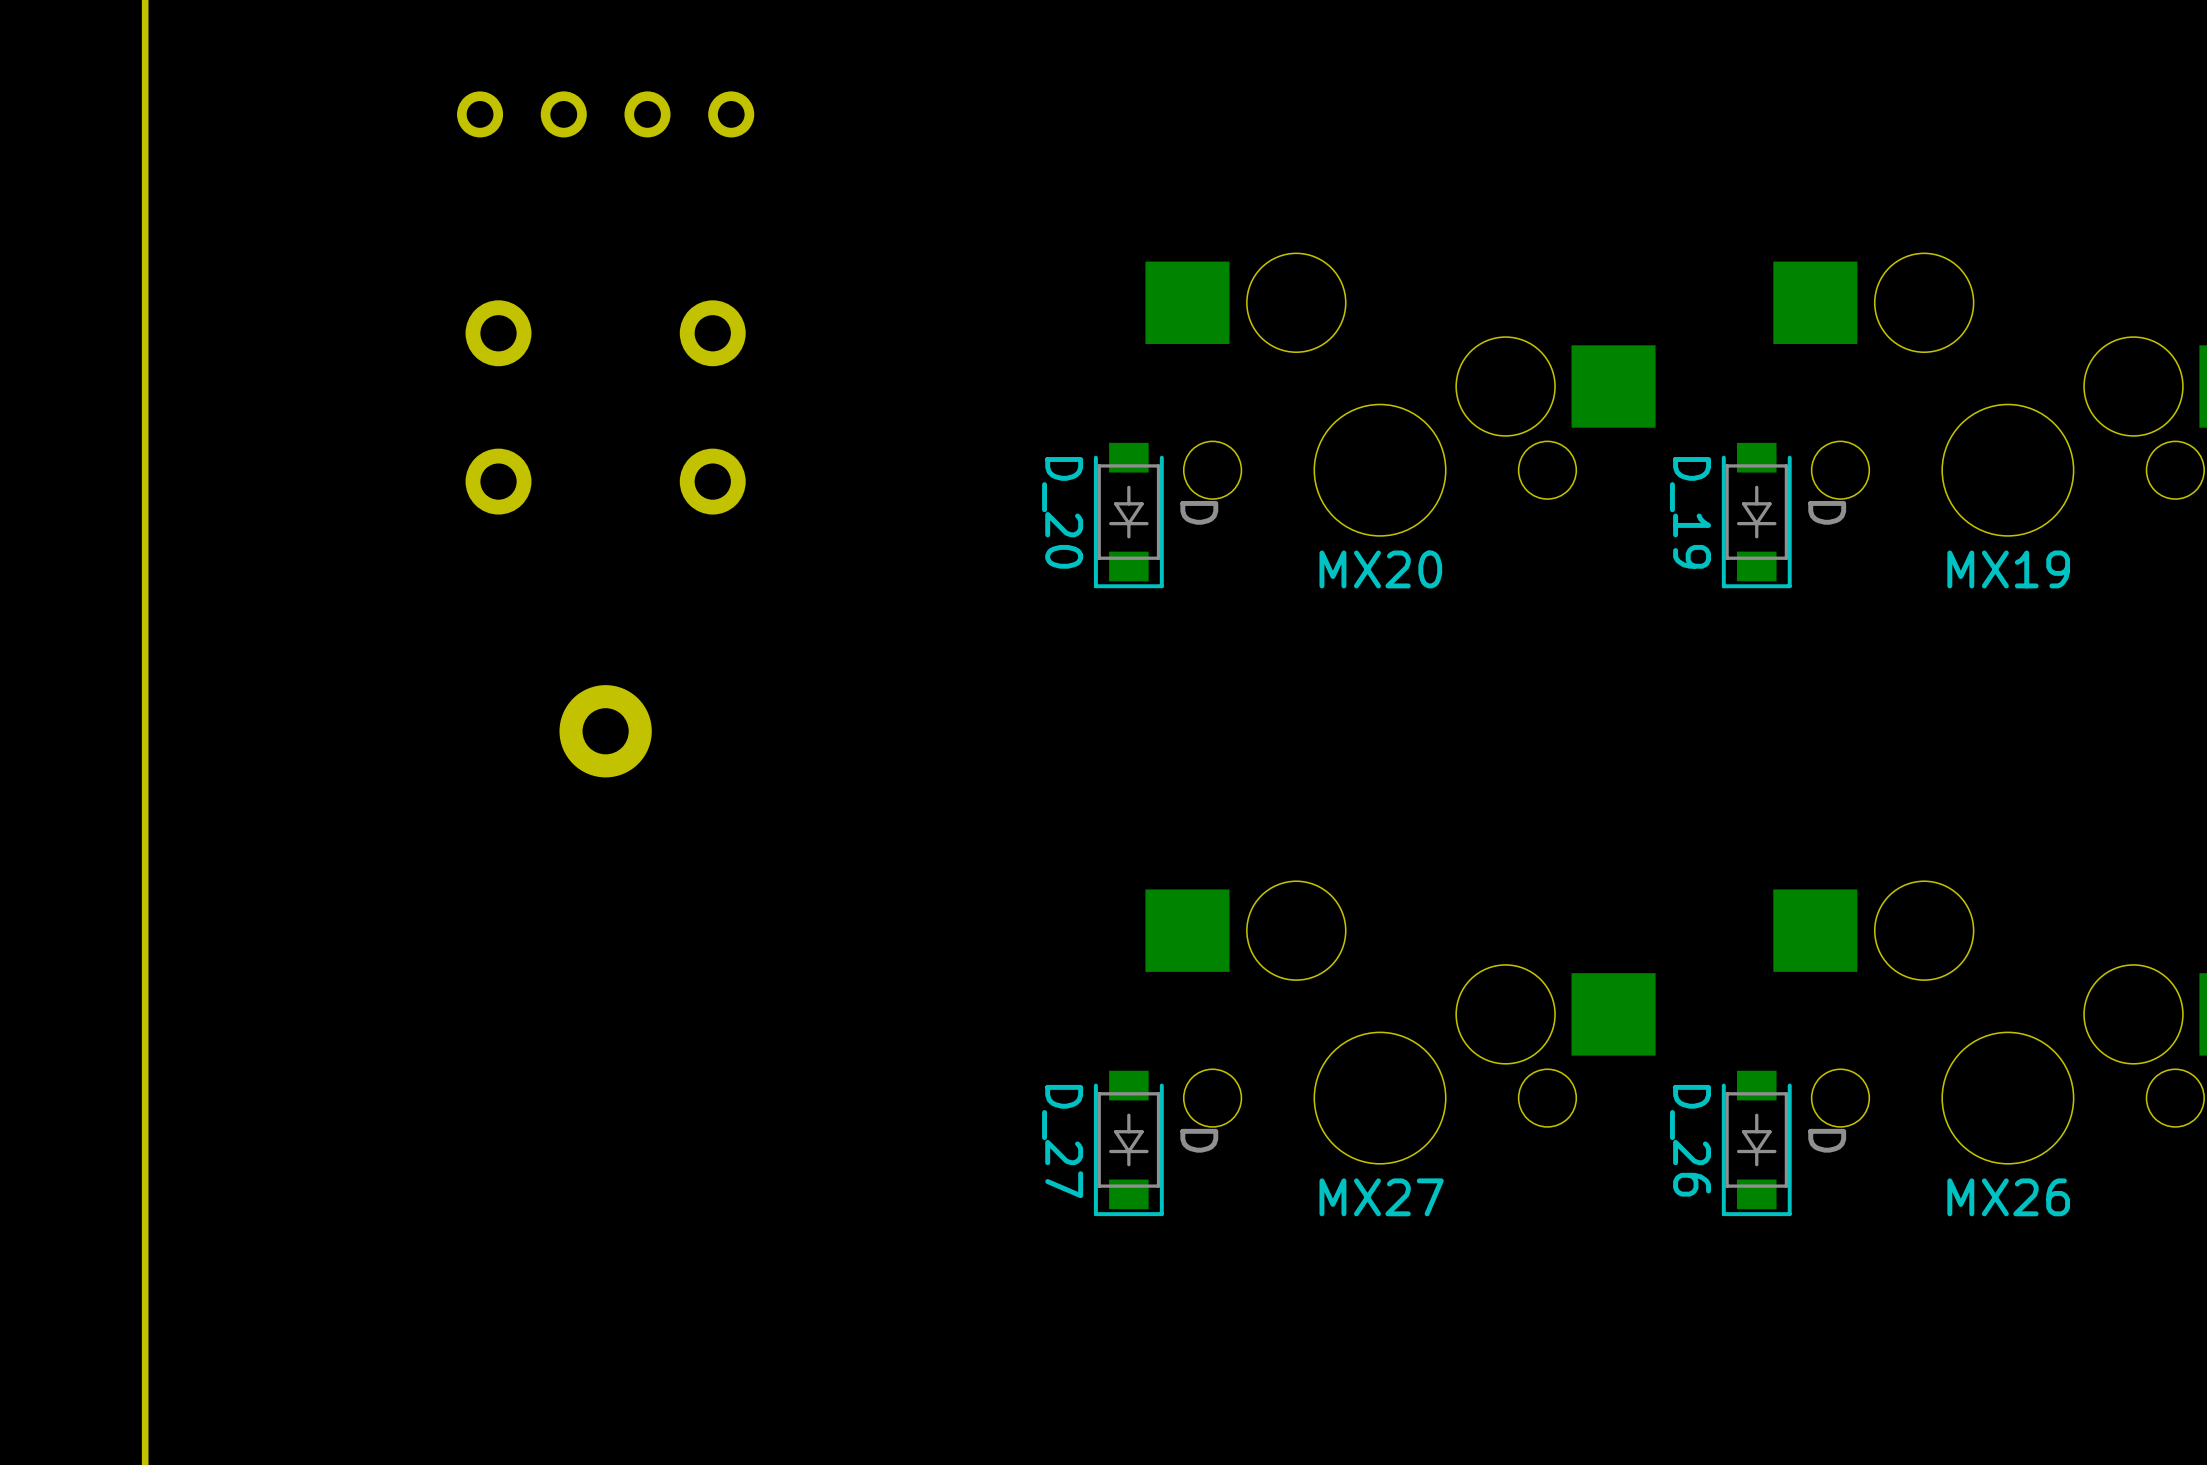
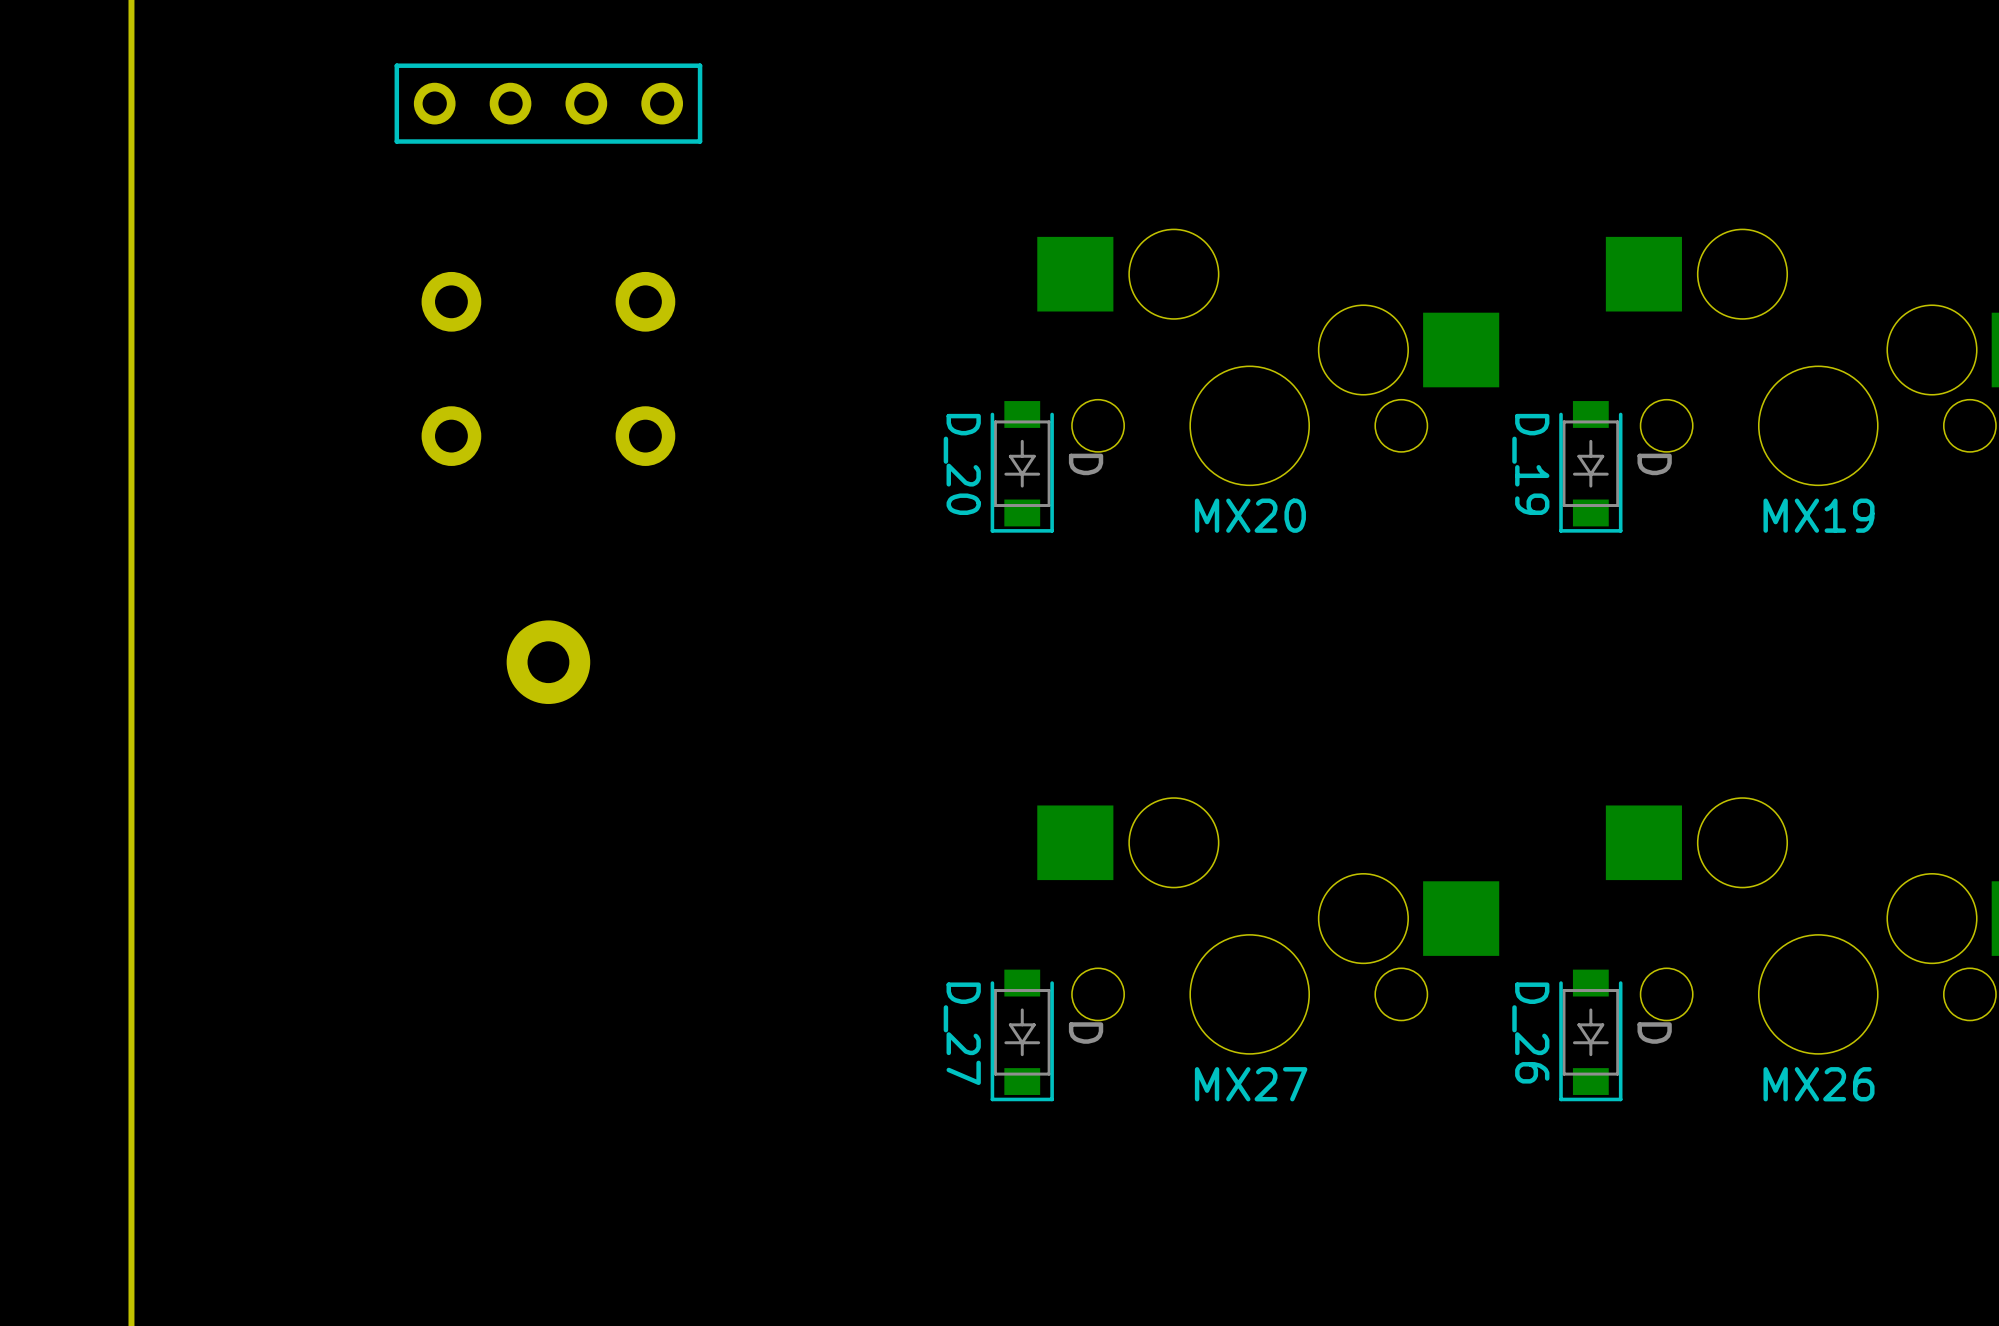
part footprint: [457, 91, 755, 138] -> [394, 63, 703, 144]

